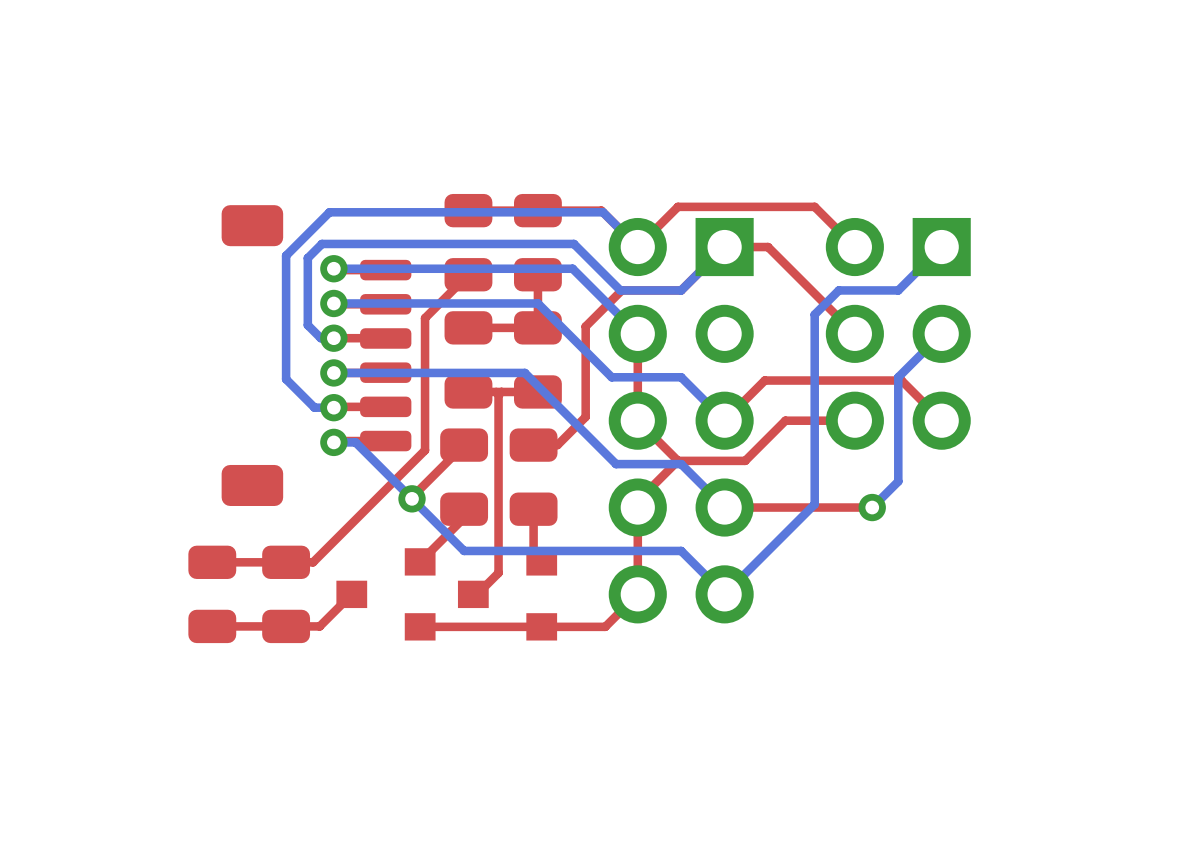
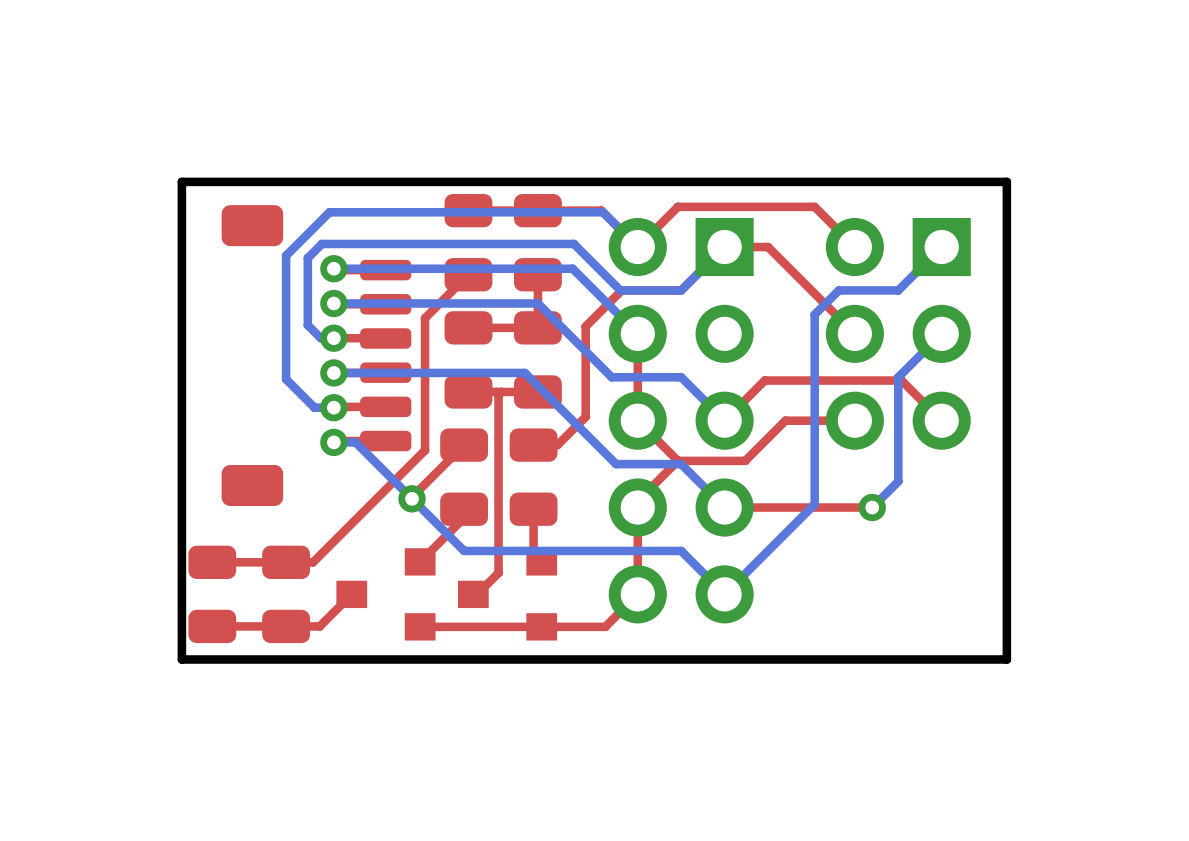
board edge: none -> (1006, 181) (181, 181) (181, 659) (1006, 659) (1006, 181)

